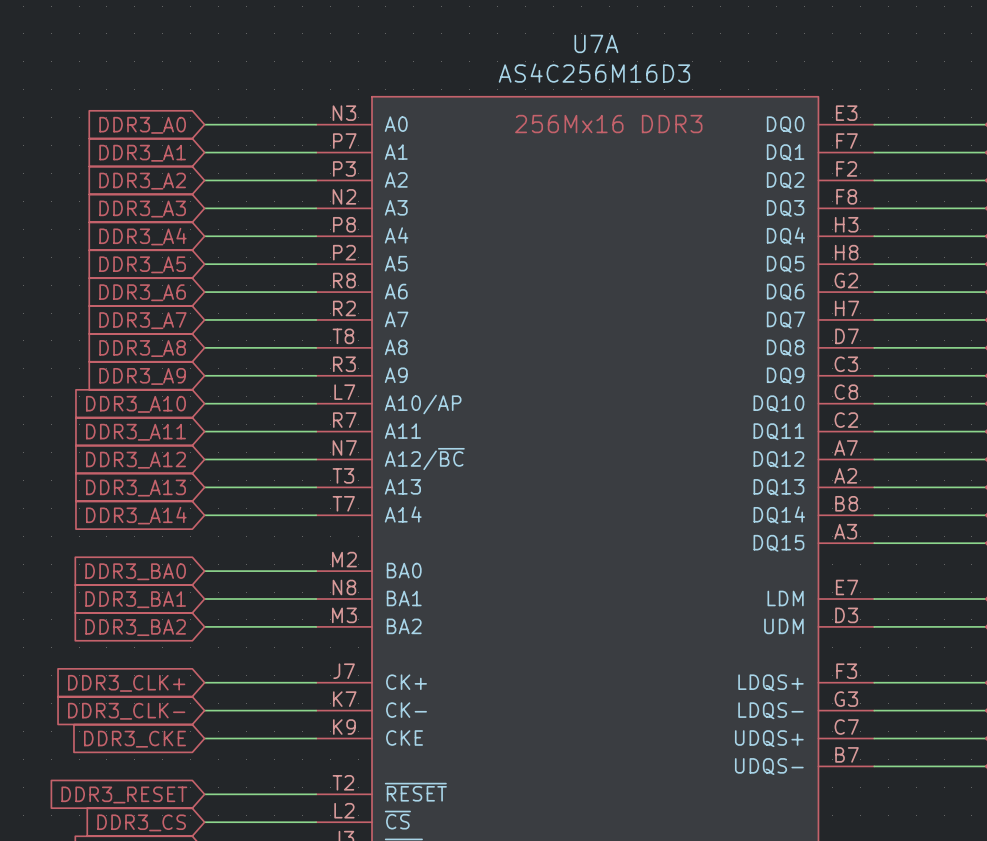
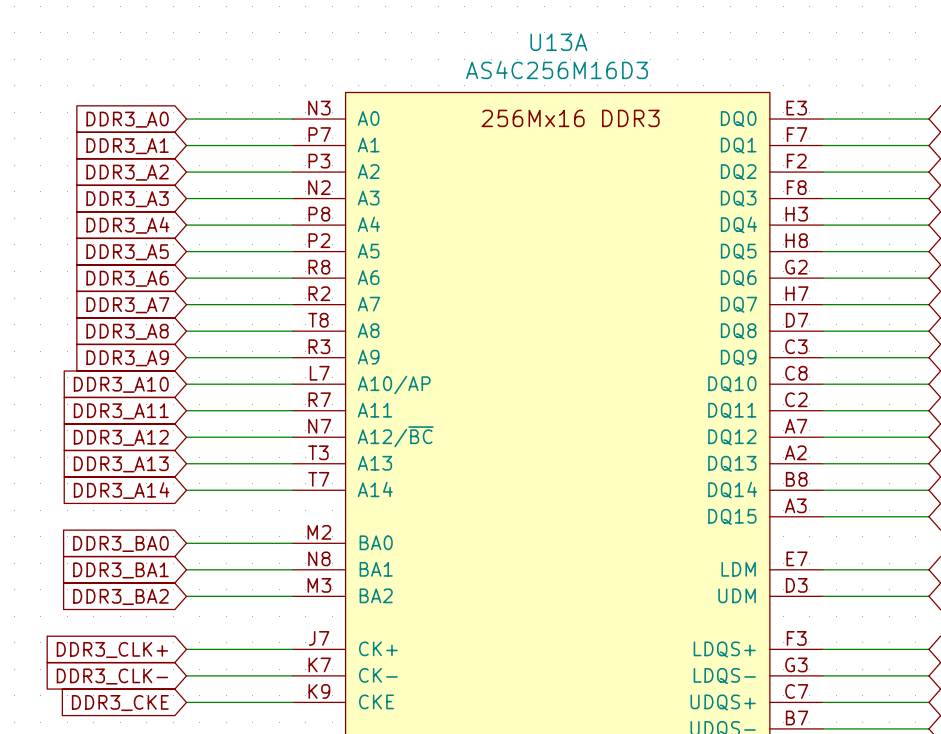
U7A name: U7A (596, 43) -> U13A (558, 42)

